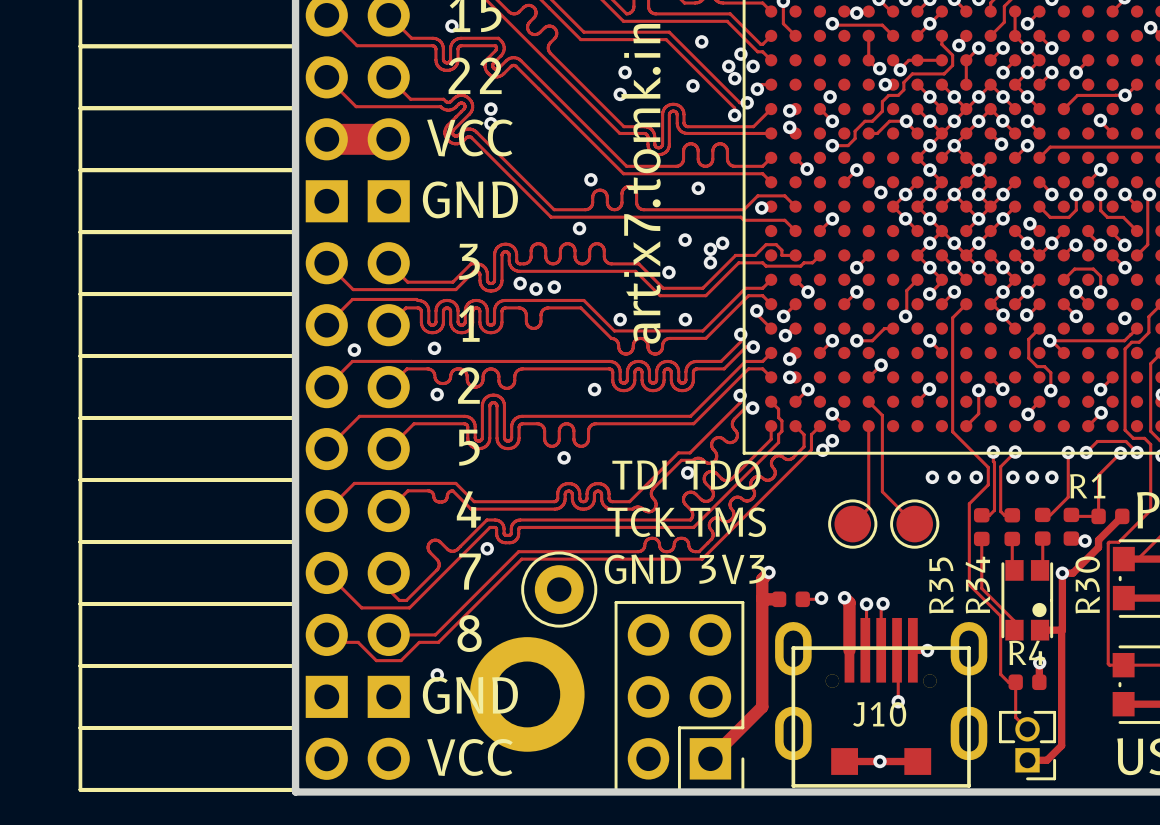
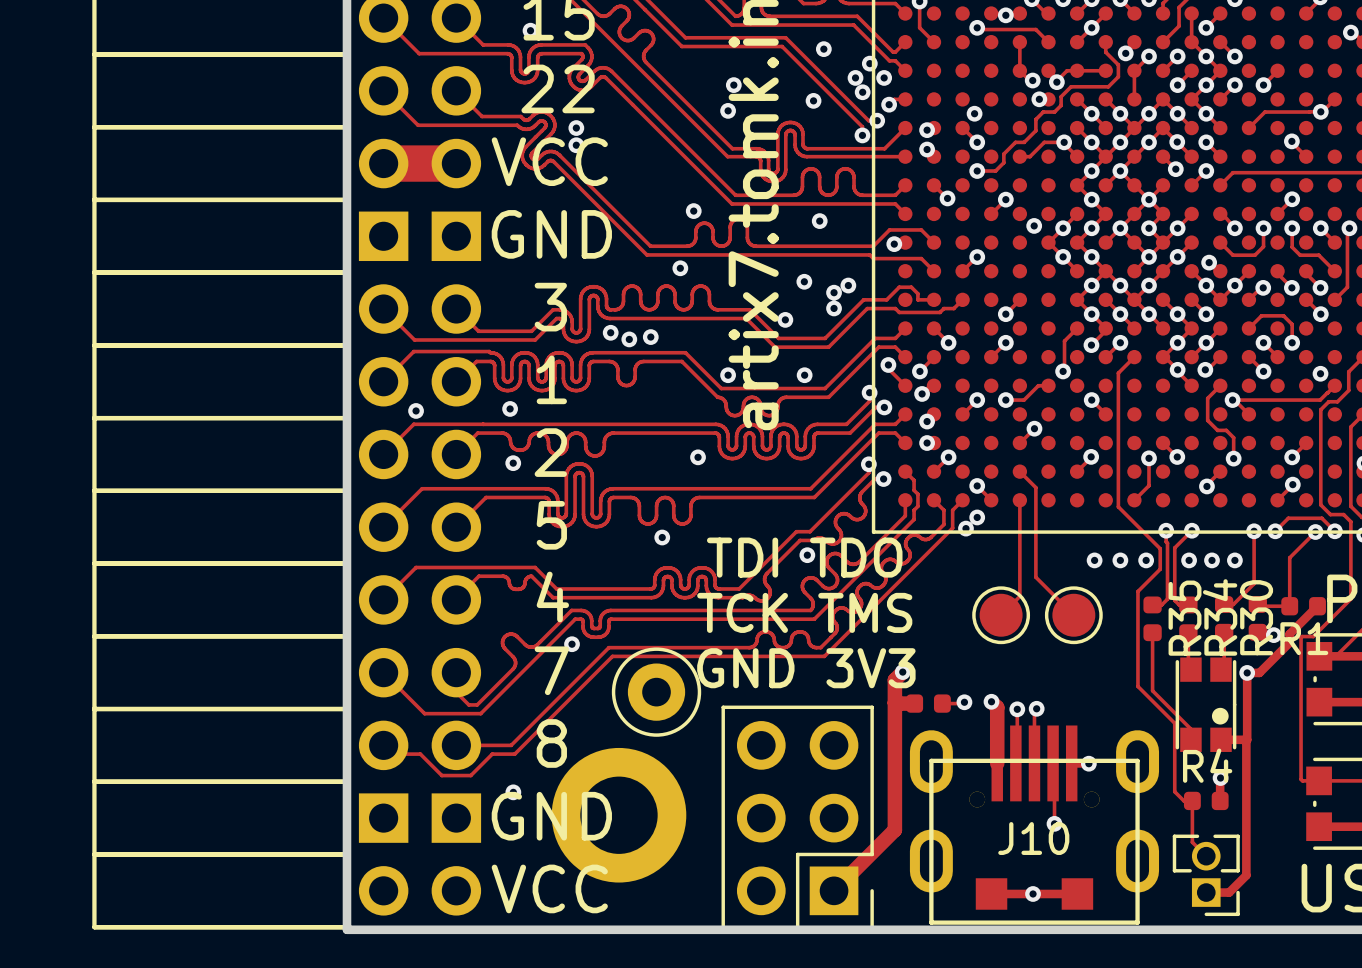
R1 name position: R1 (1087, 486) -> R1 (1304, 638)
R30 name position: R30 (1087, 584) -> R30 (1256, 617)
R35 name position: R35 (941, 585) -> R35 (1185, 618)
R34 name position: R34 (977, 585) -> R34 (1220, 617)

